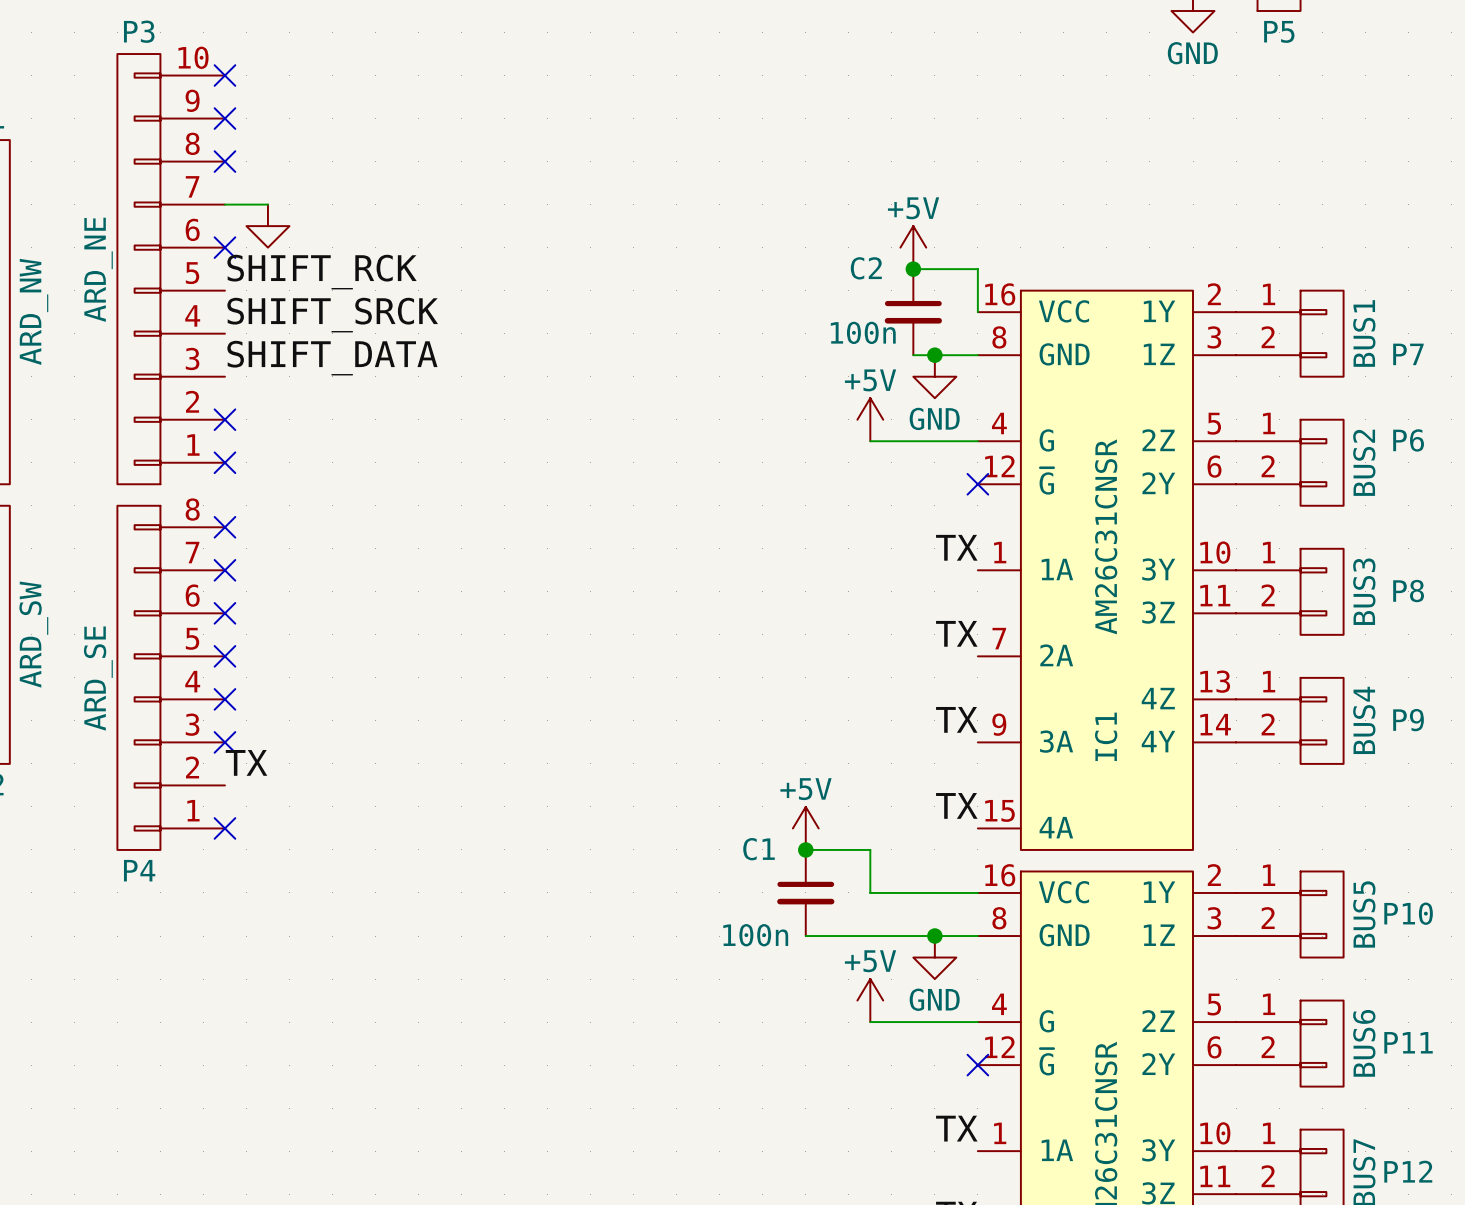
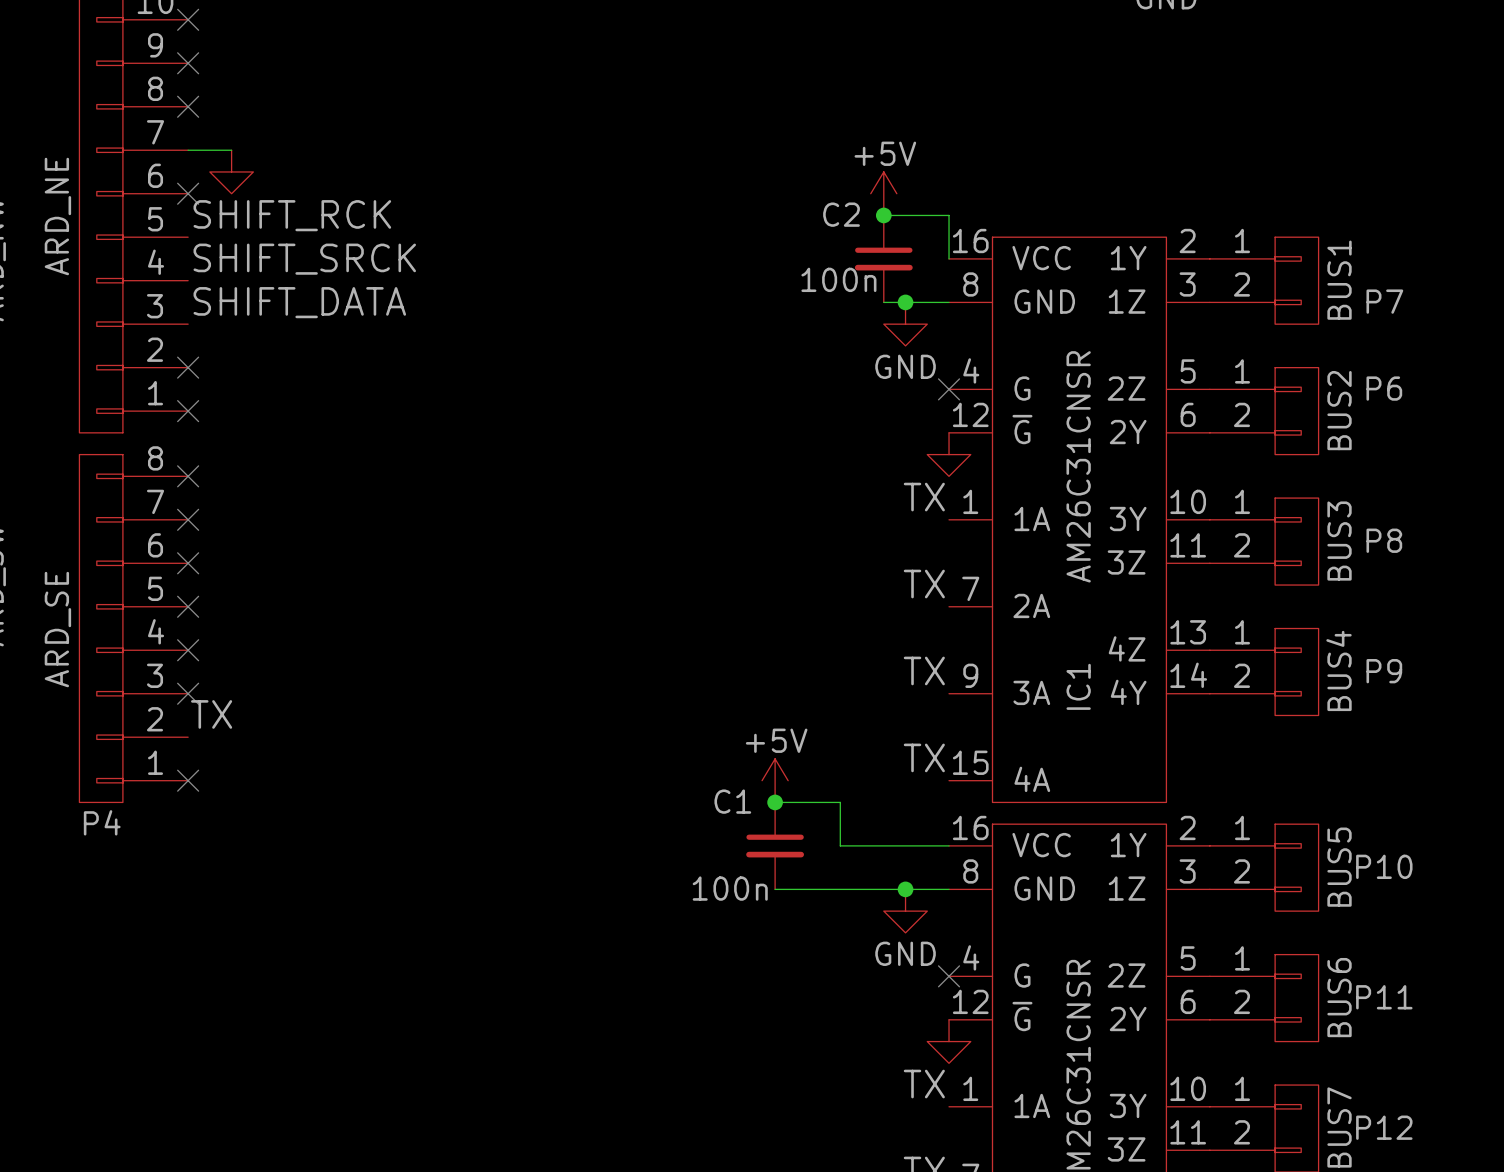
power symbol: +5V (870, 419) -> none
wire: (870, 441) (977, 441) -> none
no-connect mark position: (977, 484) -> (949, 389)
power symbol: none -> (949, 454)
power symbol: +5V (870, 1000) -> none
wire: (870, 1022) (977, 1022) -> none
no-connect mark position: (977, 1065) -> (949, 976)
power symbol: none -> (949, 1041)

